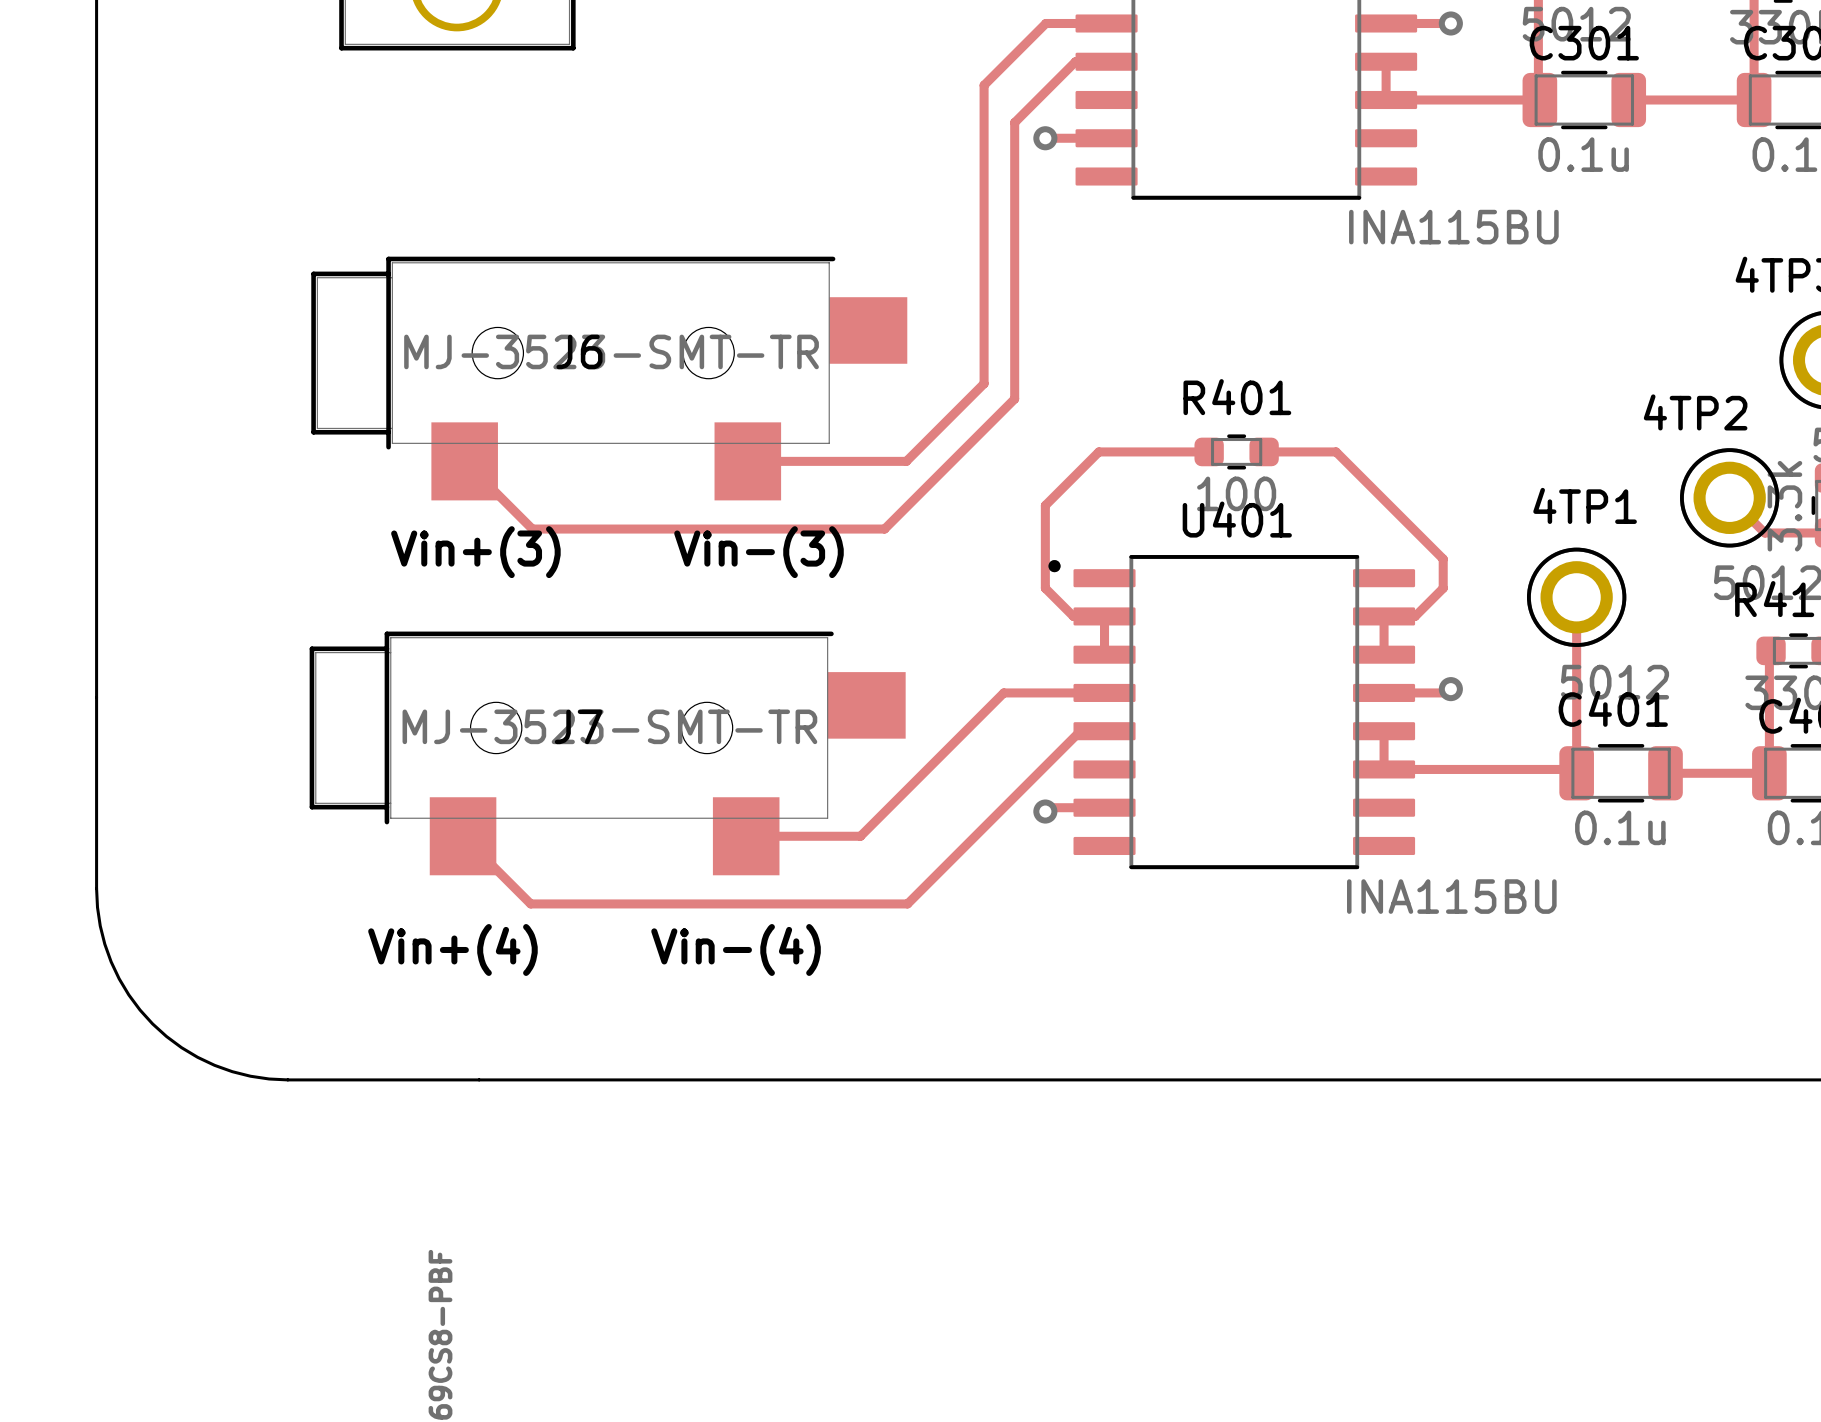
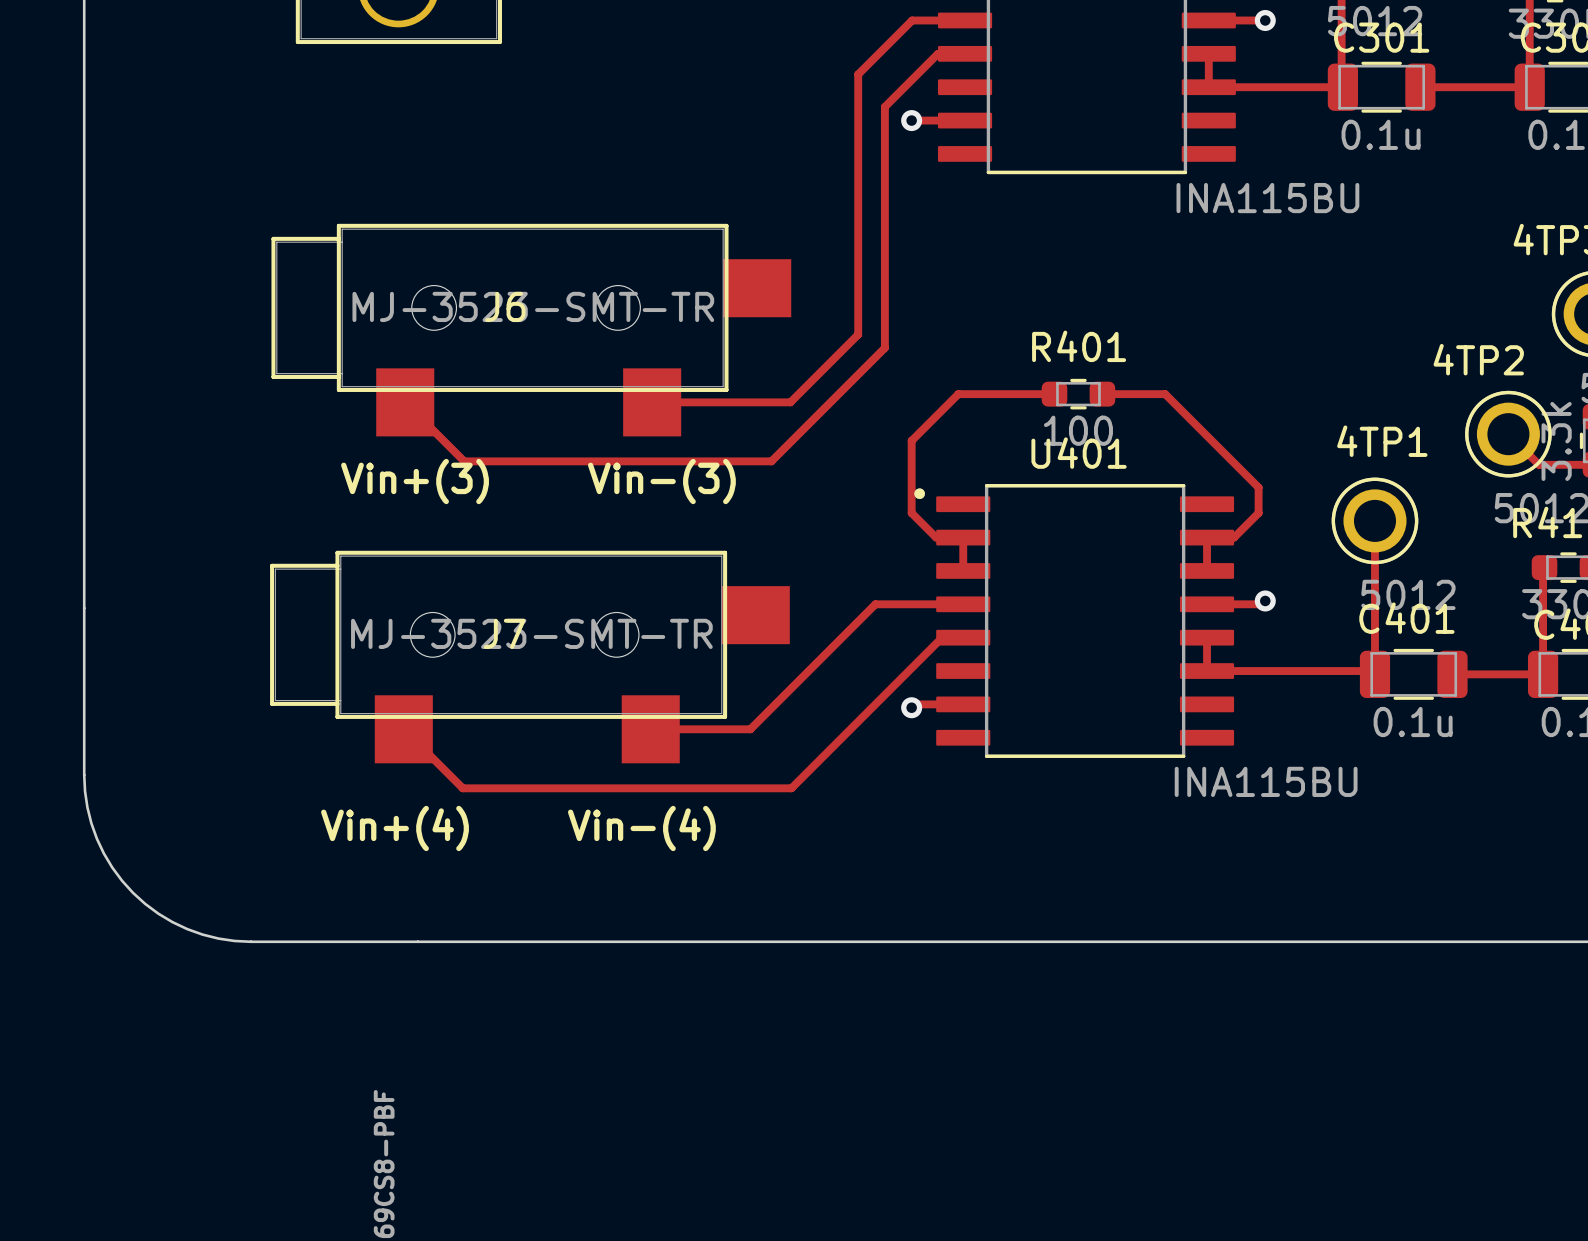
J6 footprint: [311, 256, 908, 501] -> [271, 223, 792, 437]
J7 footprint: [309, 631, 906, 876] -> [270, 550, 790, 764]

